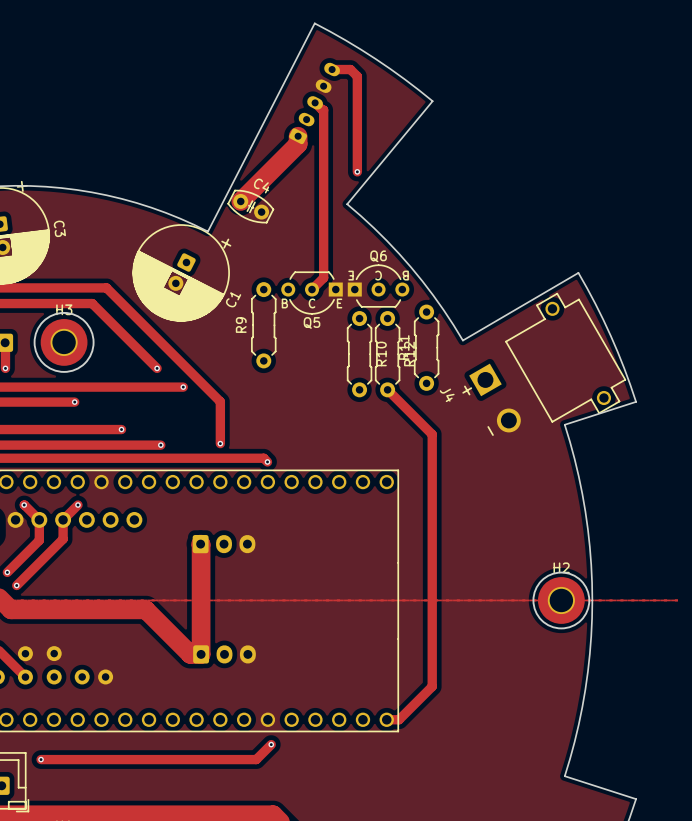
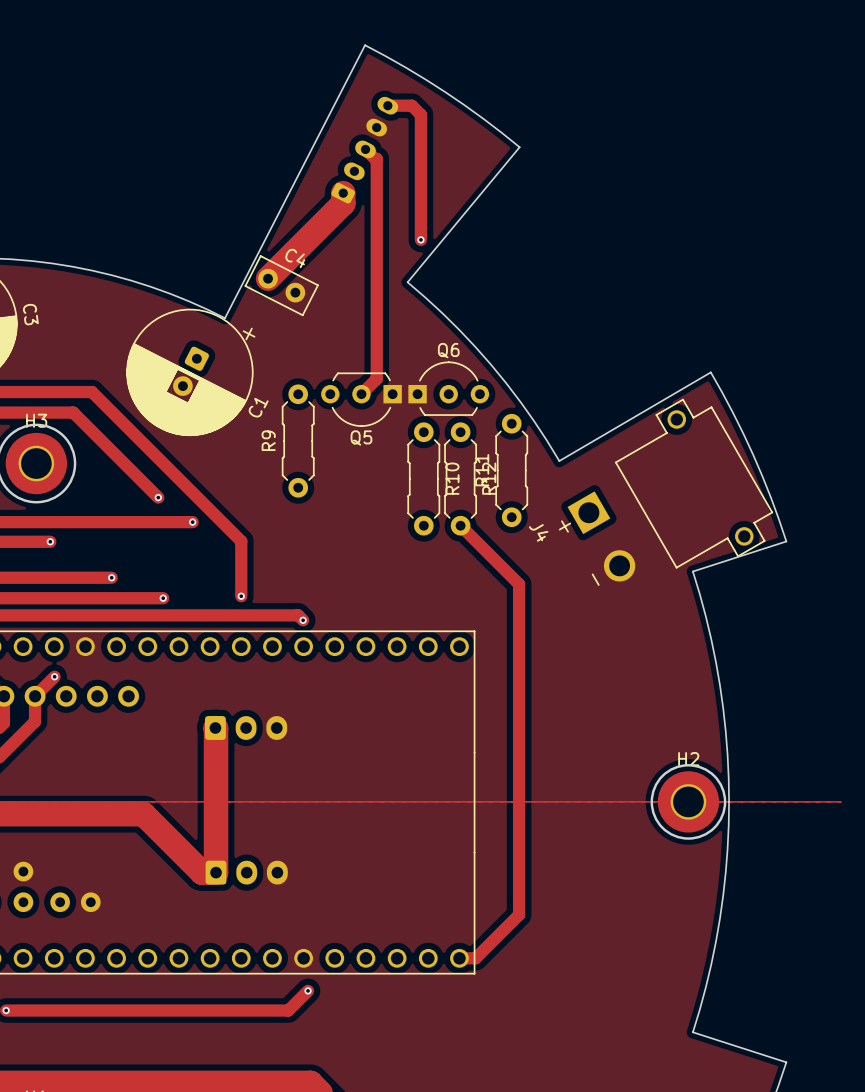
C4 footprint: [227, 189, 274, 224] -> [244, 255, 319, 316]
Q6 footprint: [347, 264, 410, 308] -> [408, 361, 490, 416]
Q5 footprint: [281, 271, 343, 315] -> [321, 372, 402, 427]

